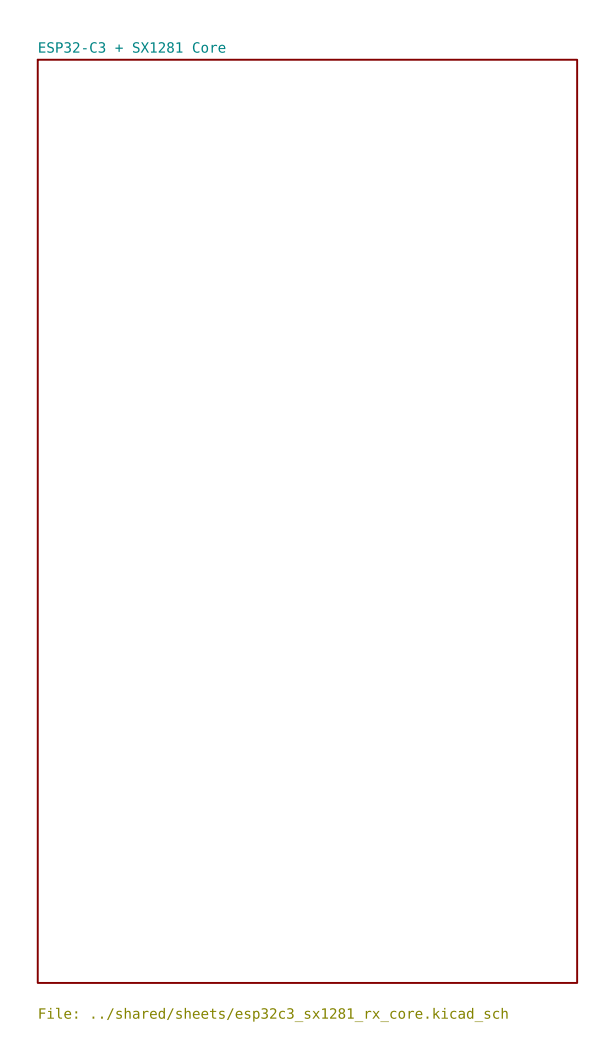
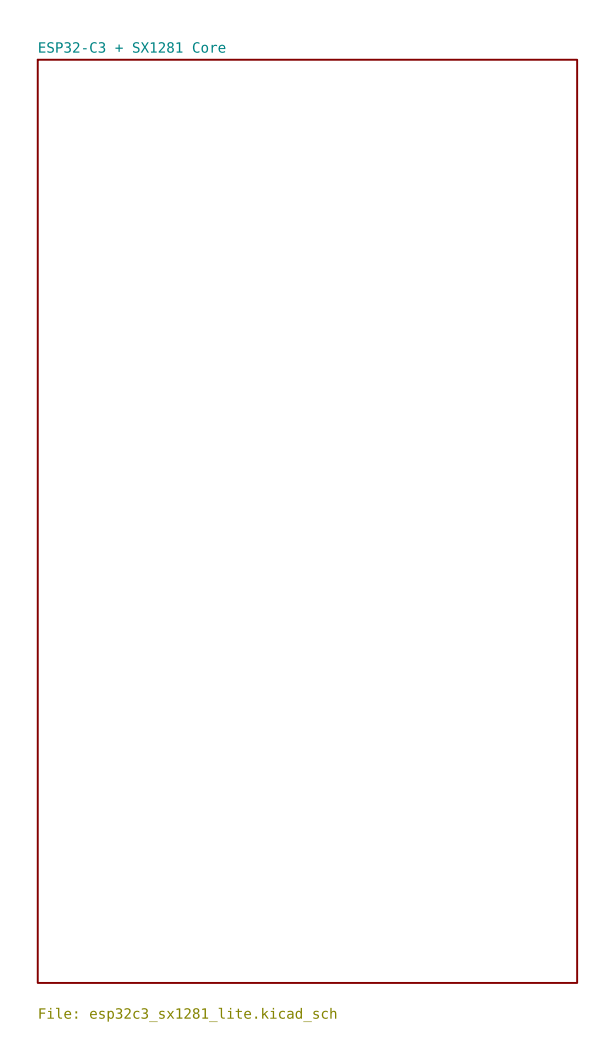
sheet ESP32-C3 + SX1281 Core value: File: ../shared/sheets/esp32c3_sx1281_rx_core.kicad_sch (273, 1014) -> File: esp32c3_sx1281_lite.kicad_sch (187, 1014)

